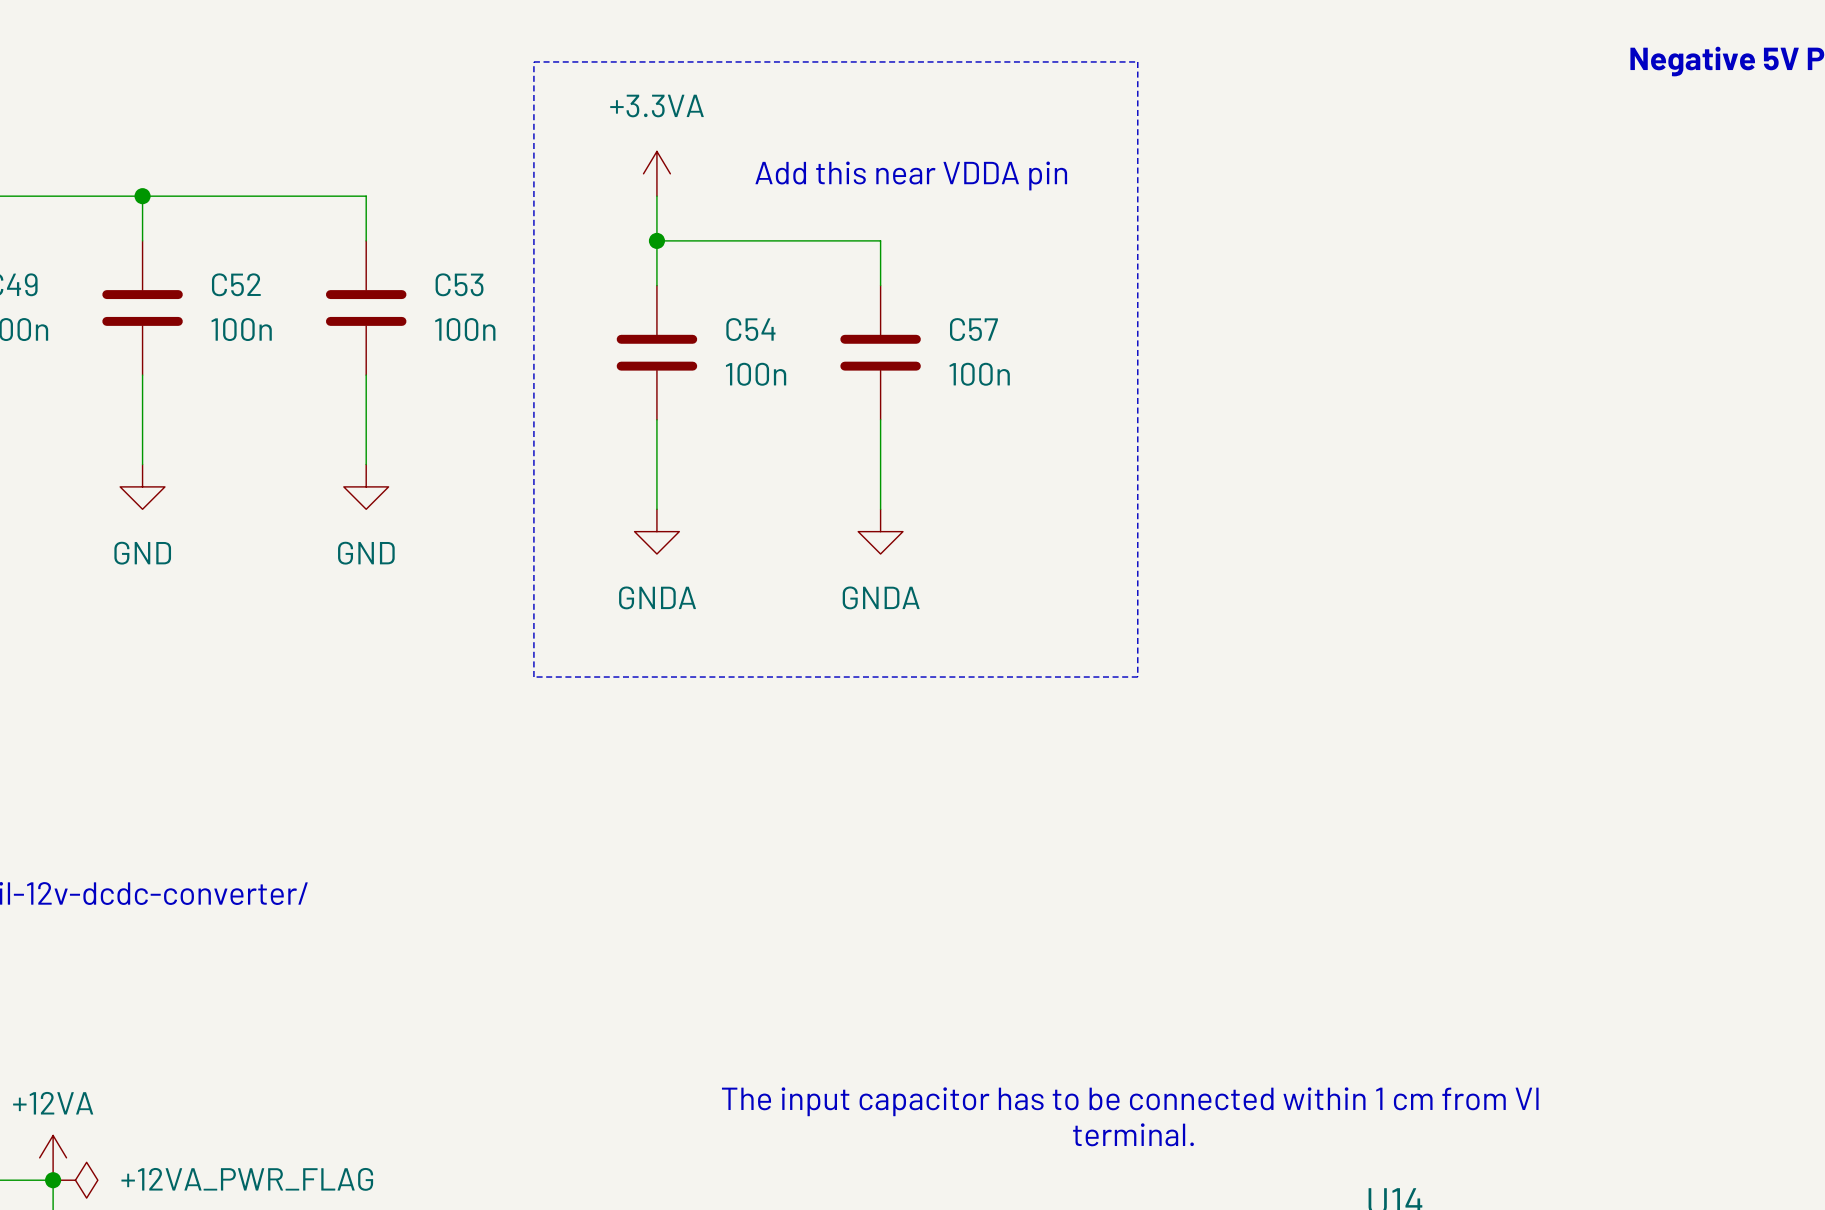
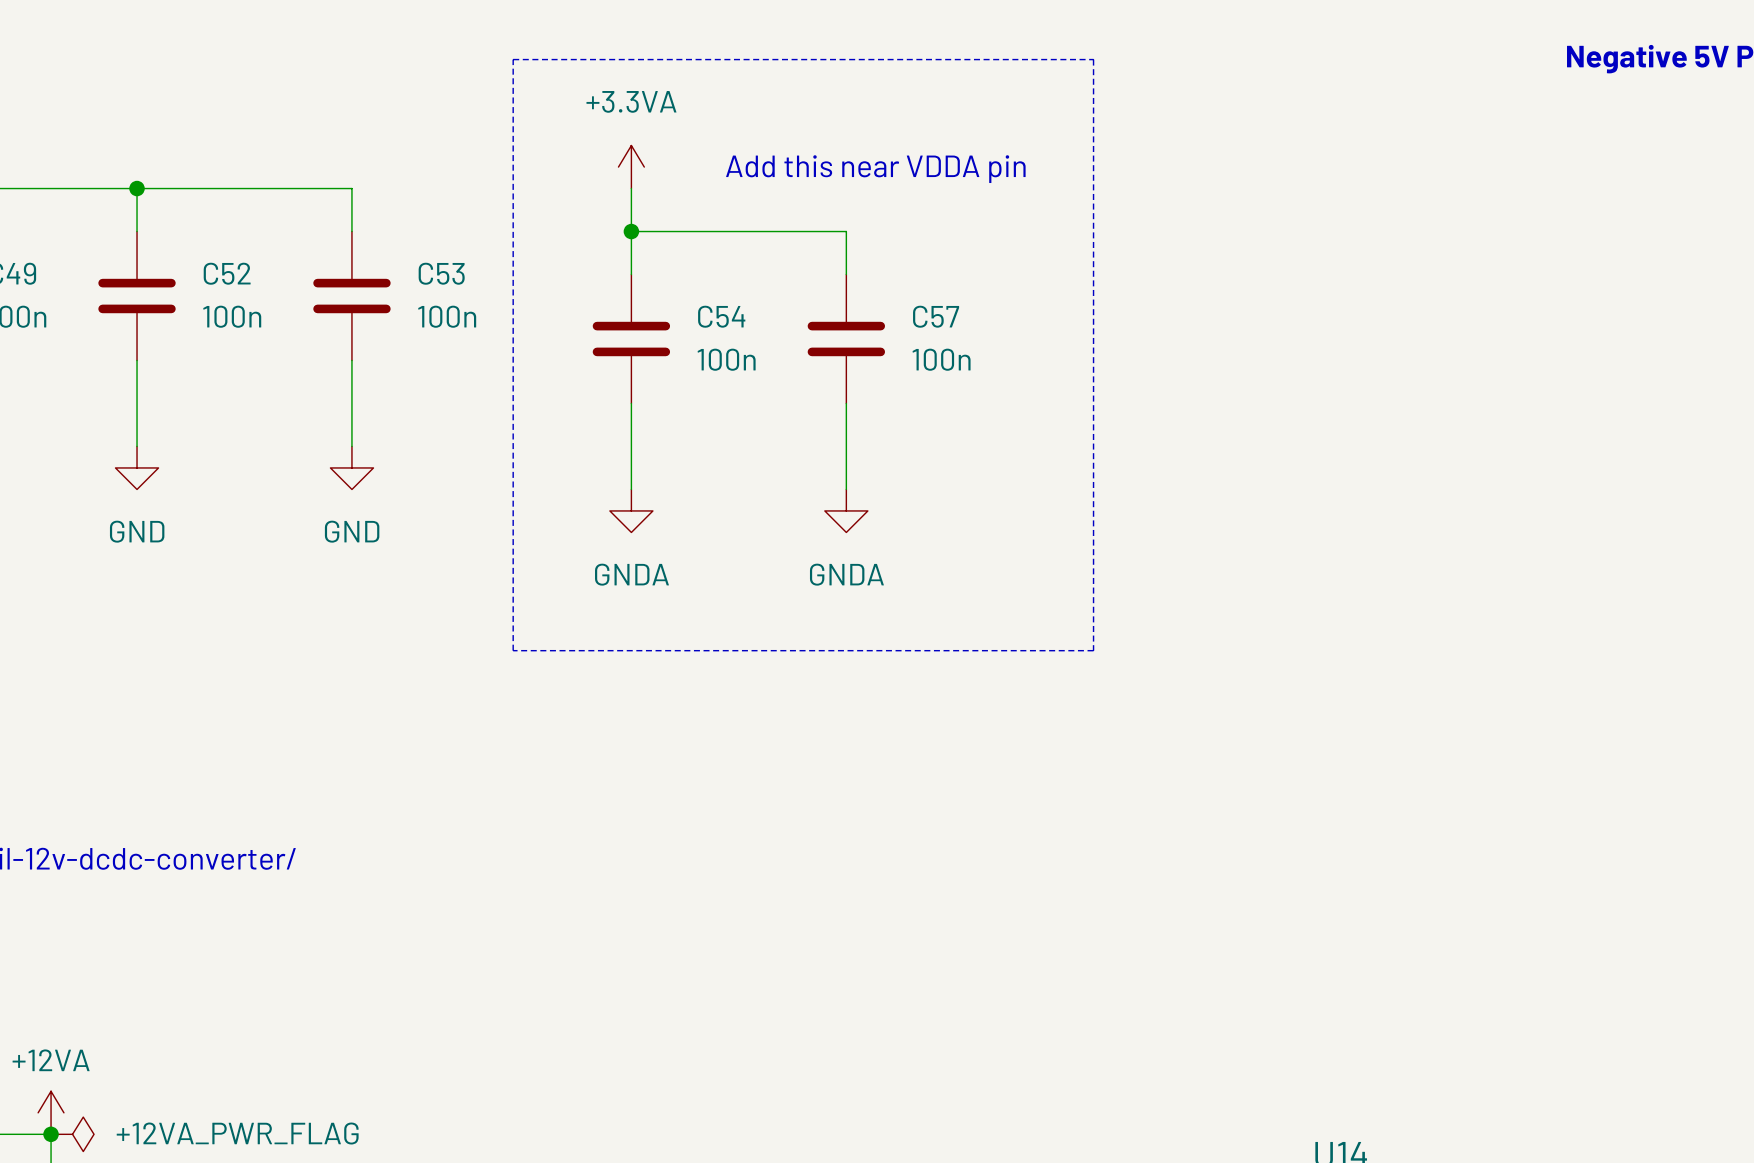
text: The input capacitor has to be connected within 1 cm from VI (1130, 1101) -> none
text: terminal. (1133, 1134) -> none

